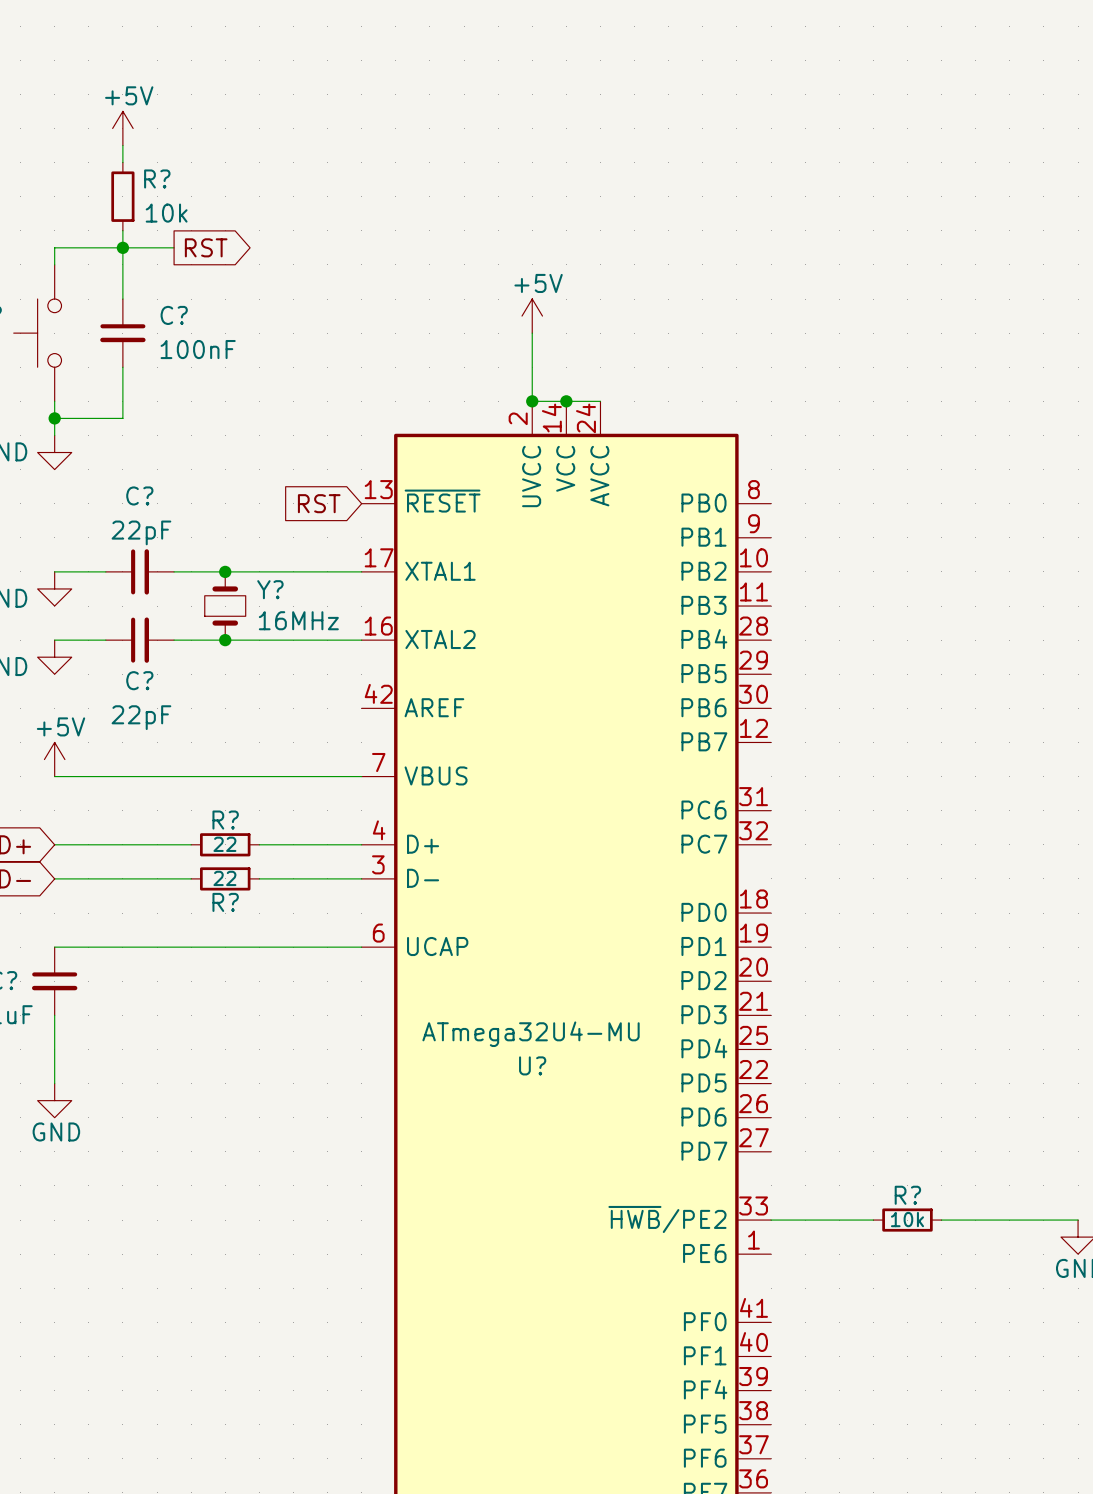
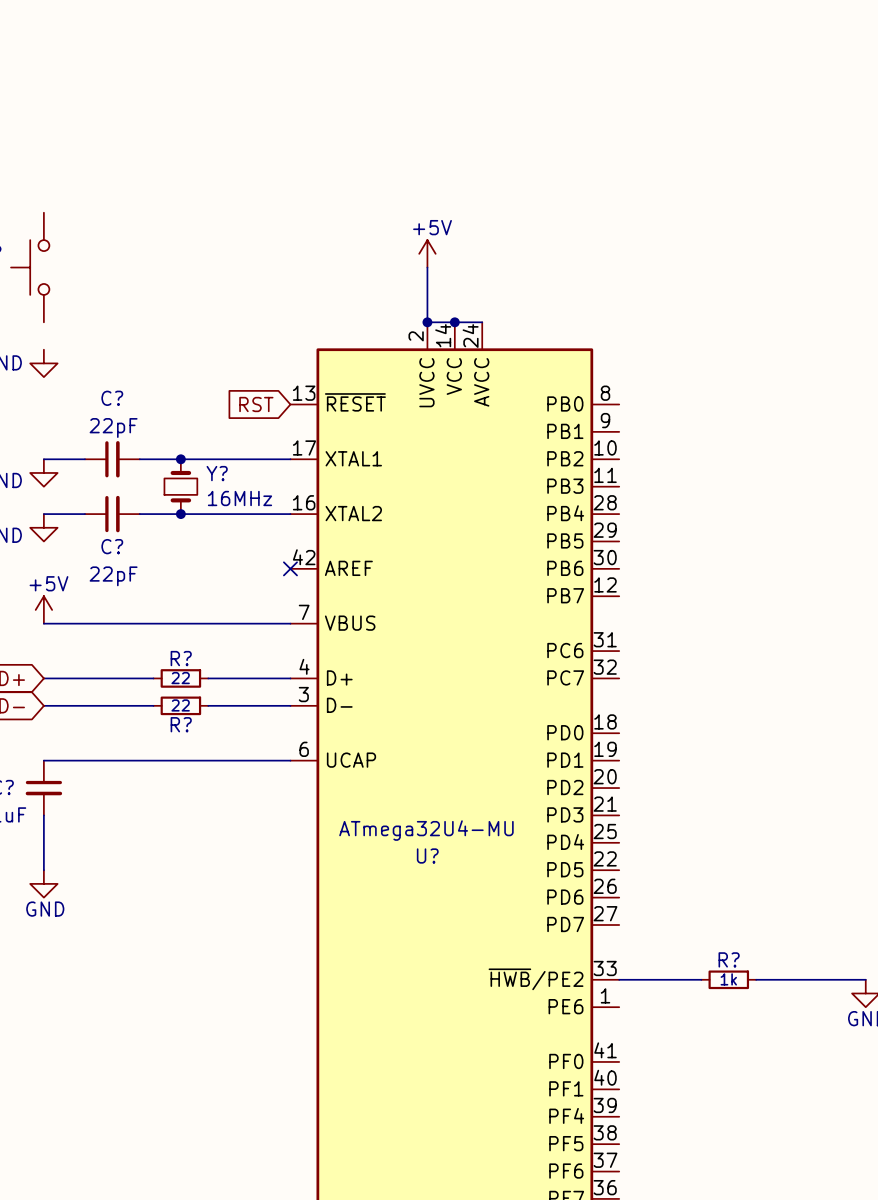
power symbol: +5V (122, 128) -> none
wire: (122, 145) (122, 162) -> none
R?: 10k (122, 196) -> none
wire: (122, 230) (122, 299) -> none
junction: (122, 247) -> none
wire: (174, 247) (54, 247) (54, 264) -> none
global label: RST (206, 247) -> none
C?: 100nF (122, 333) -> none
wire: (122, 367) (122, 418) (54, 418) -> none
wire: (54, 401) (54, 435) -> none
junction: (54, 418) -> none
no-connect mark: none -> (290, 568)
R? value: 10k (907, 1219) -> 1k (728, 979)

